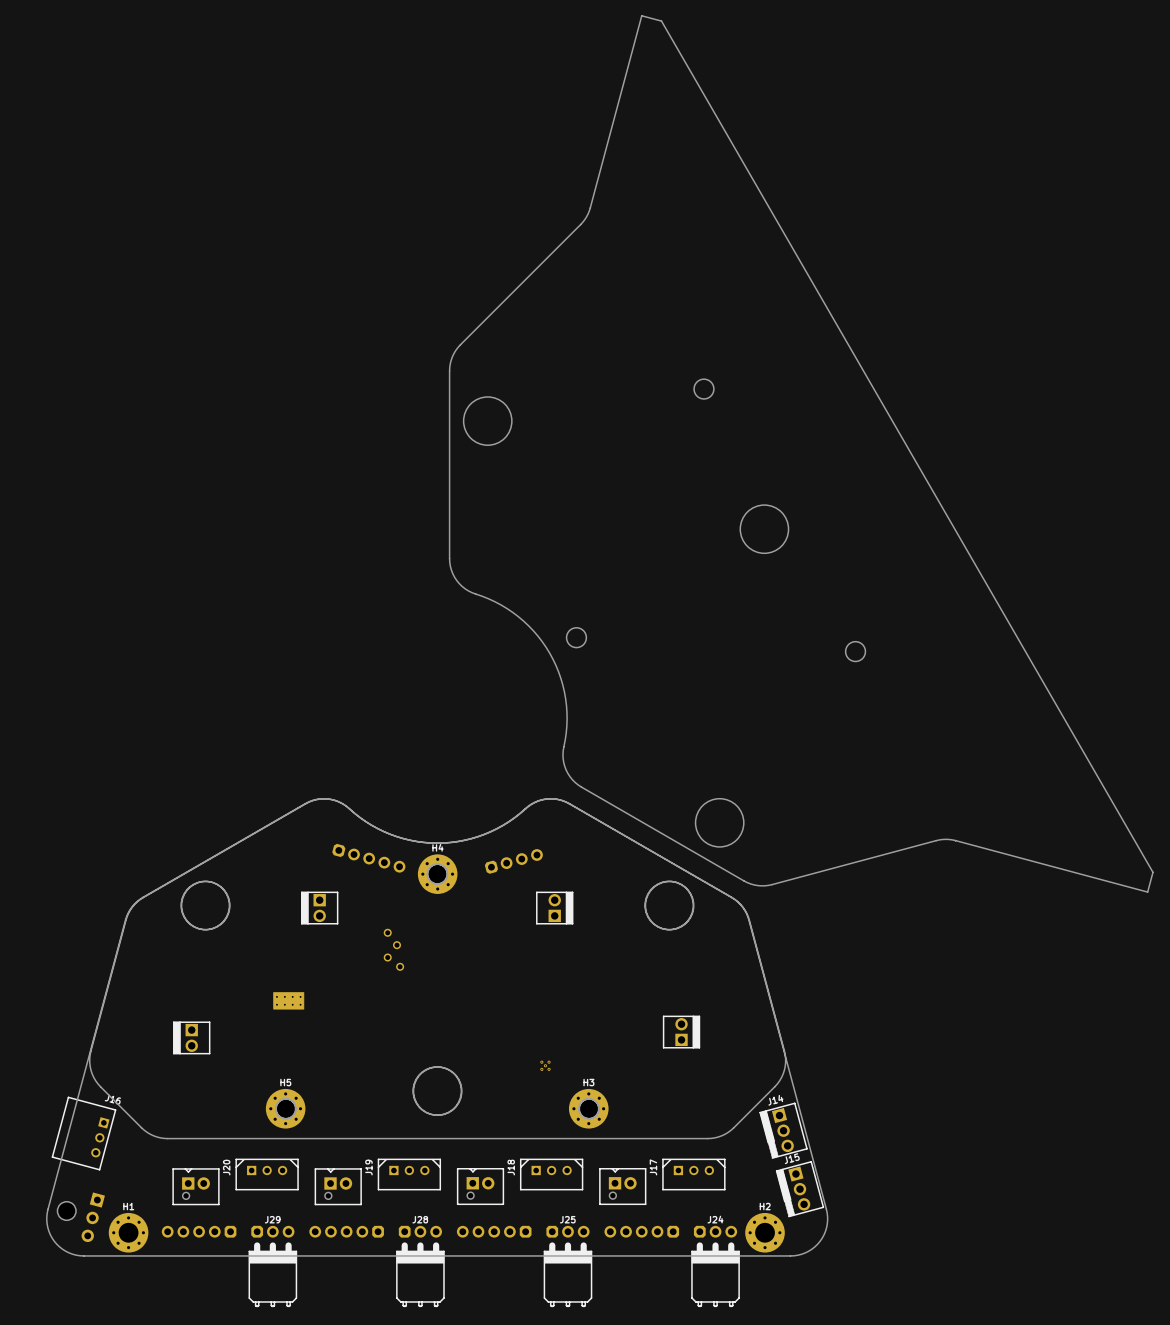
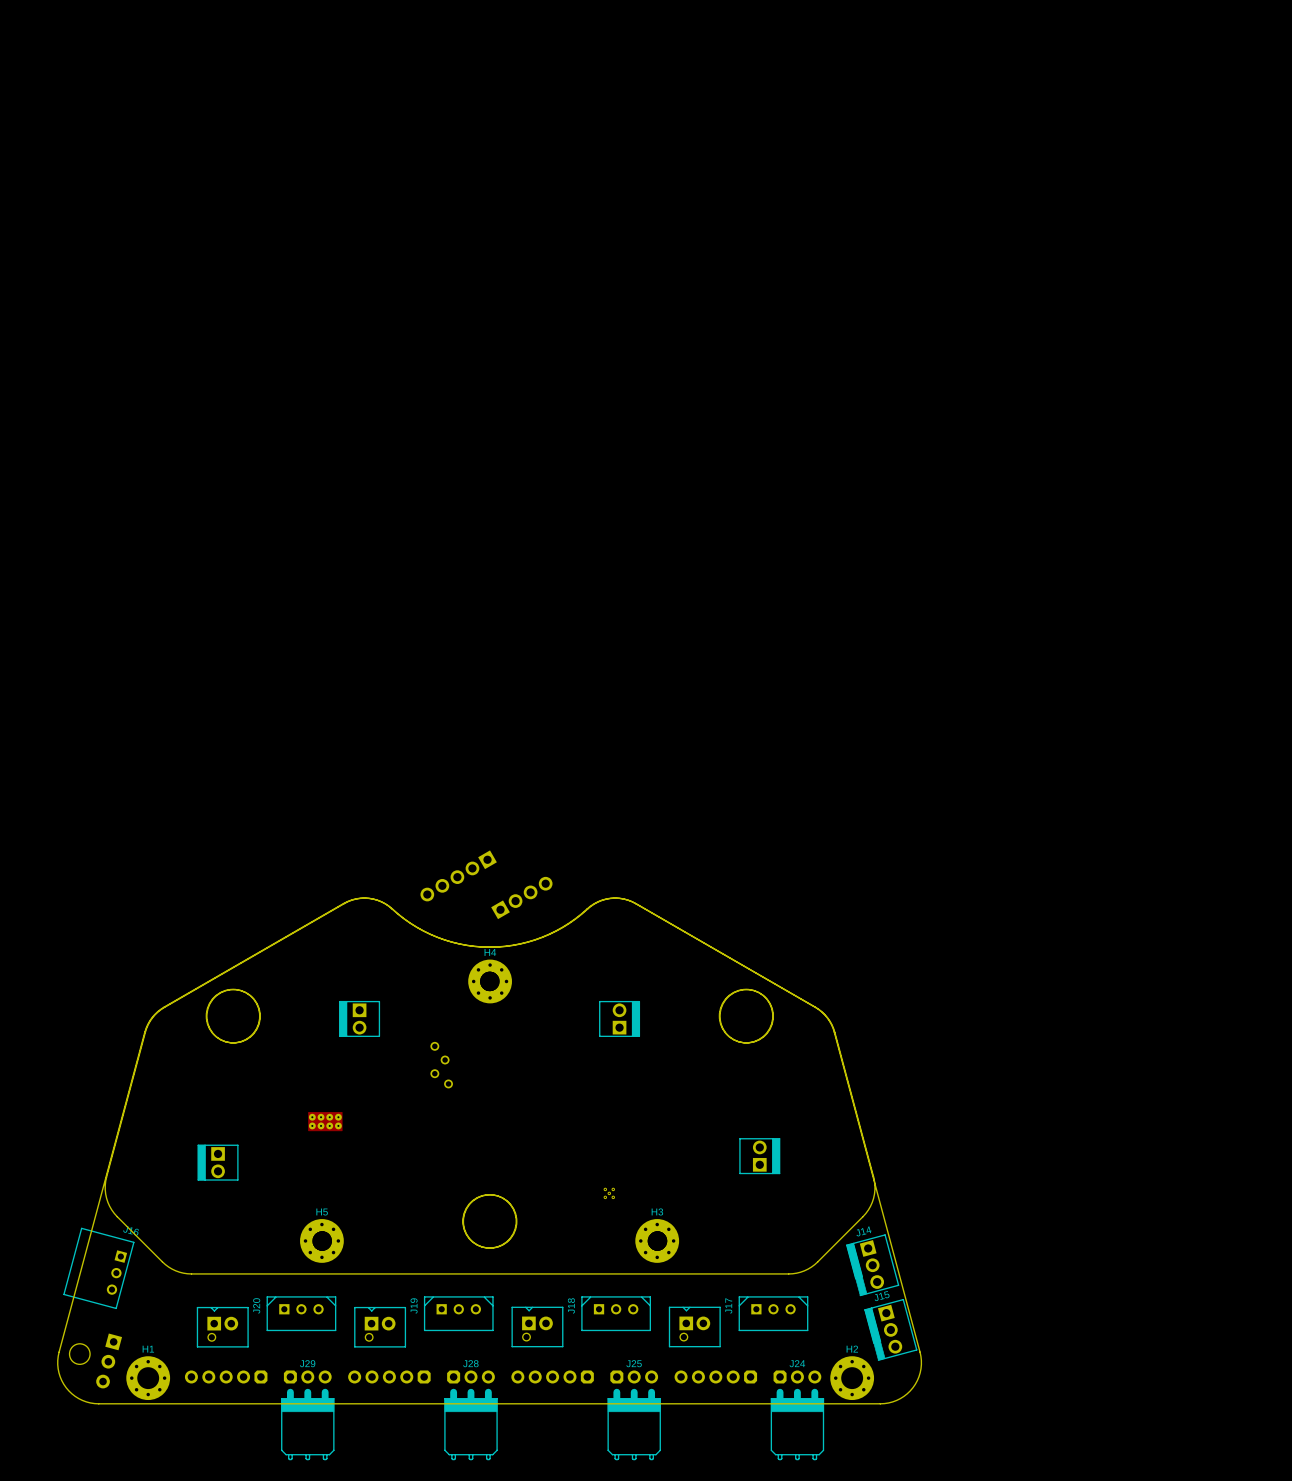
board edge: (641, 15) (661, 21) (1152, 872) (1147, 892) (945, 839) (772, 884) (761, 885) (747, 882) (581, 787) (572, 779) (566, 769) (563, 758) (567, 719) (564, 691) (558, 671) (549, 653) (537, 636) (518, 616) (494, 601) (468, 590) (454, 577) (449, 558) (449, 371) (451, 360) (460, 344) (586, 216) (641, 15) -> none
round board edge: [693, 378, 715, 400] -> none
round board edge: [463, 396, 513, 446] -> none
round board edge: [739, 504, 790, 554] -> none
round board edge: [565, 627, 587, 649] -> none
round board edge: [845, 641, 867, 663] -> none
part: none -> (458, 875)
part: none -> (521, 898)
round board edge: [694, 798, 745, 848] -> none
part: (368, 858) -> none
part: (513, 861) -> none

